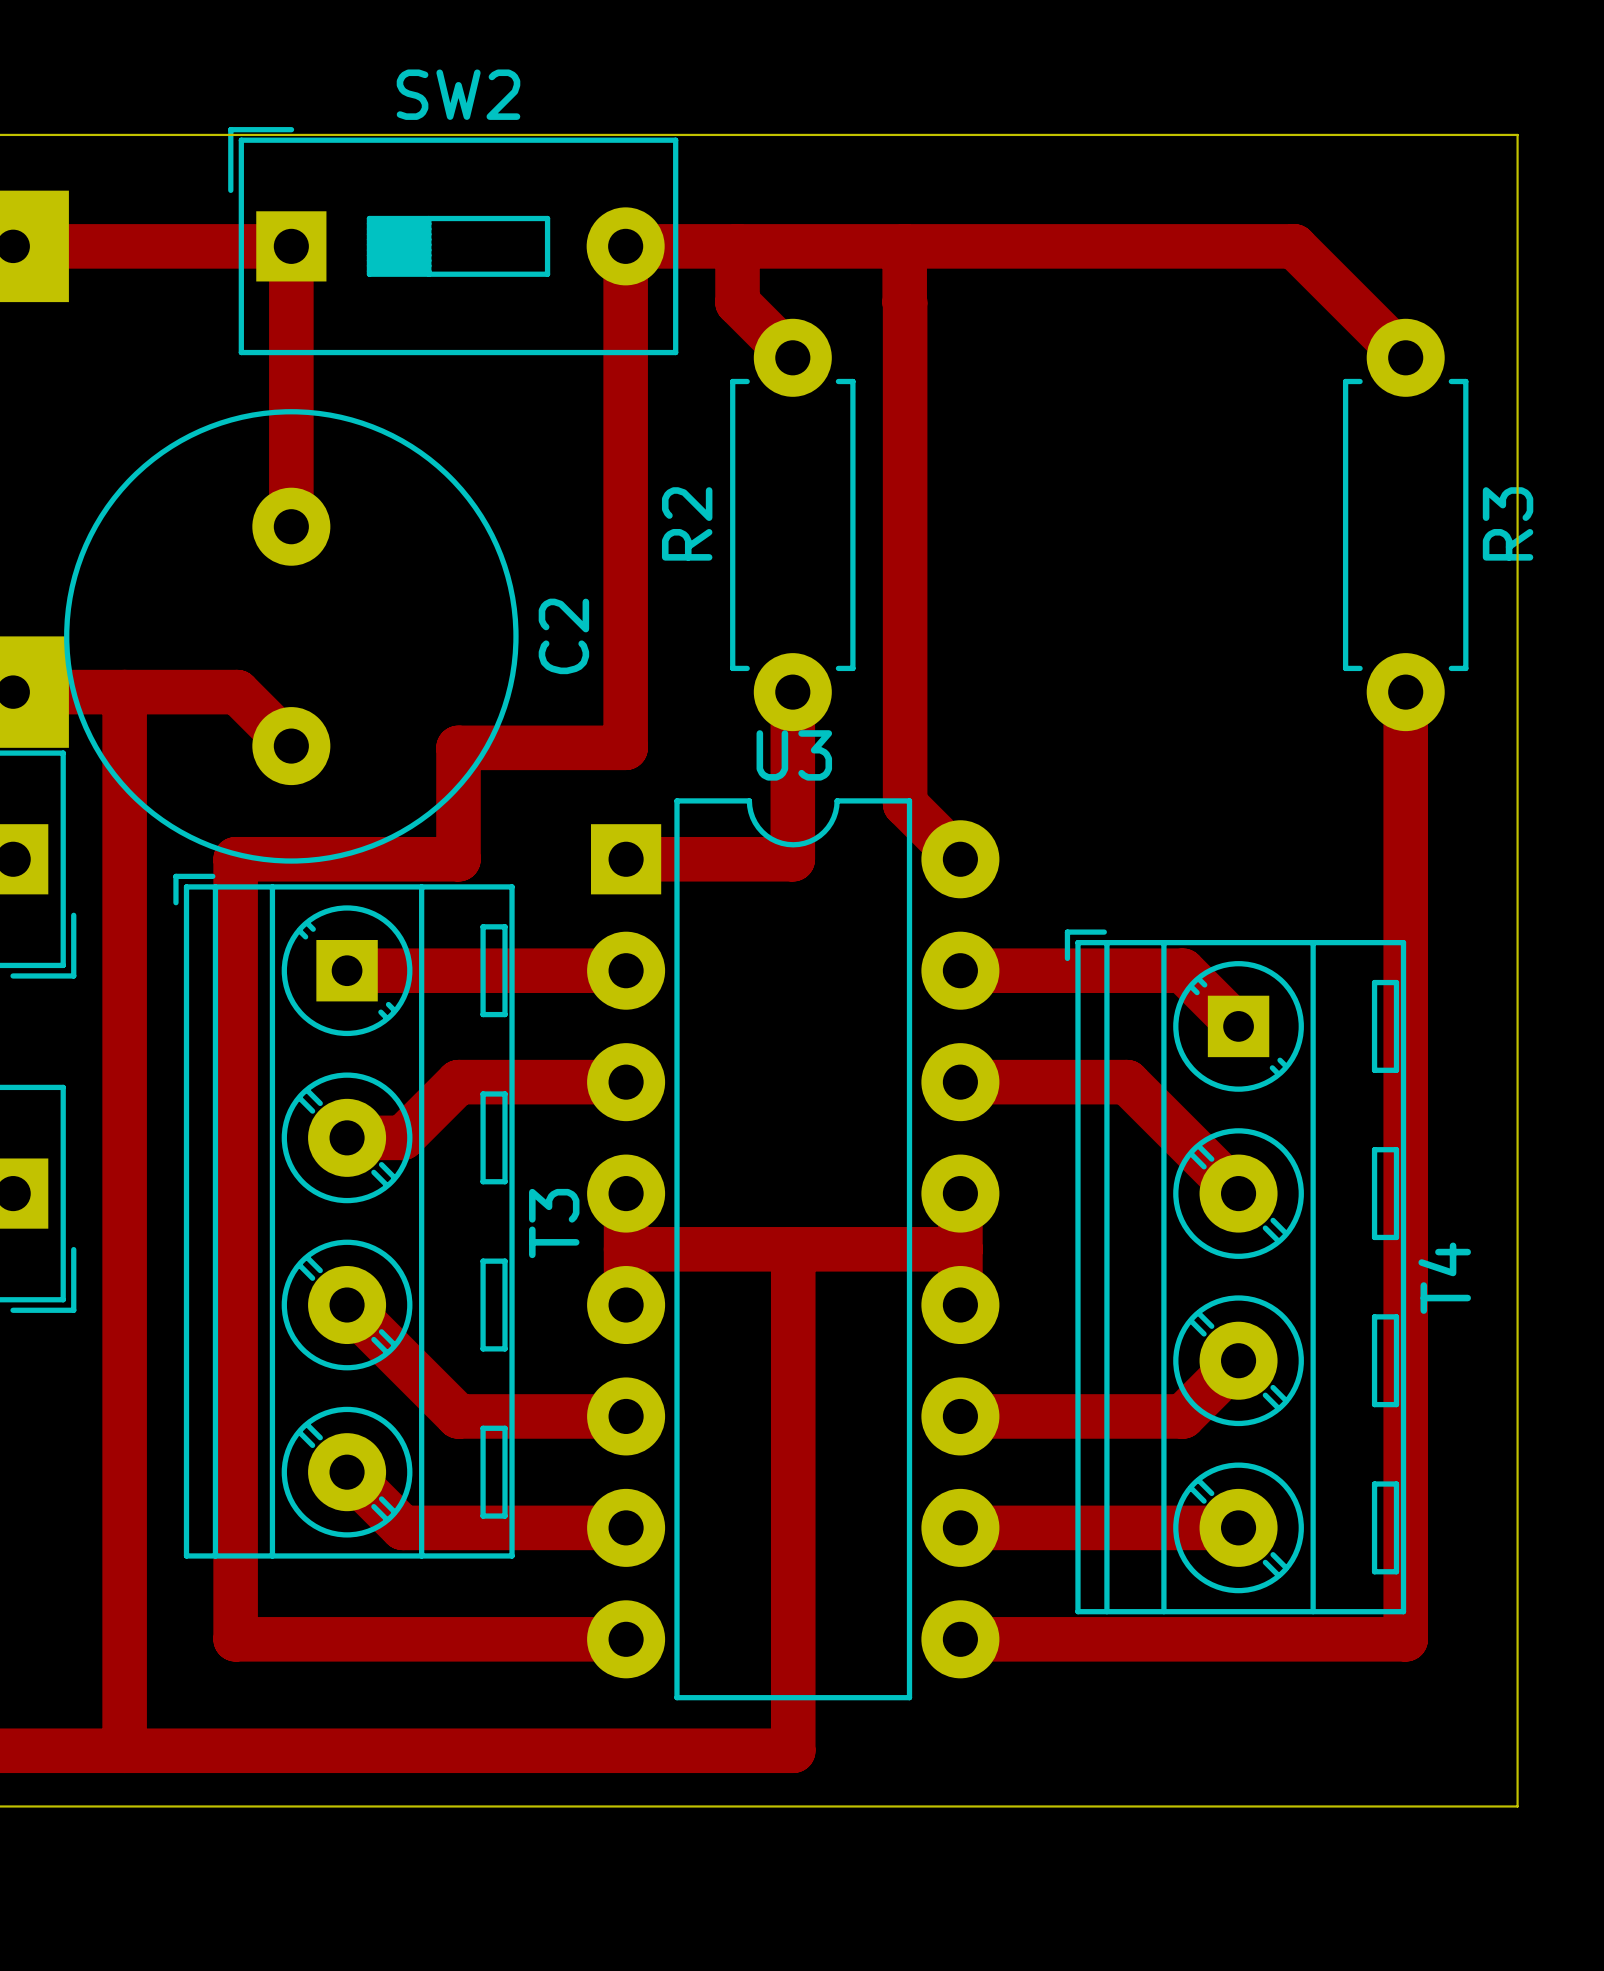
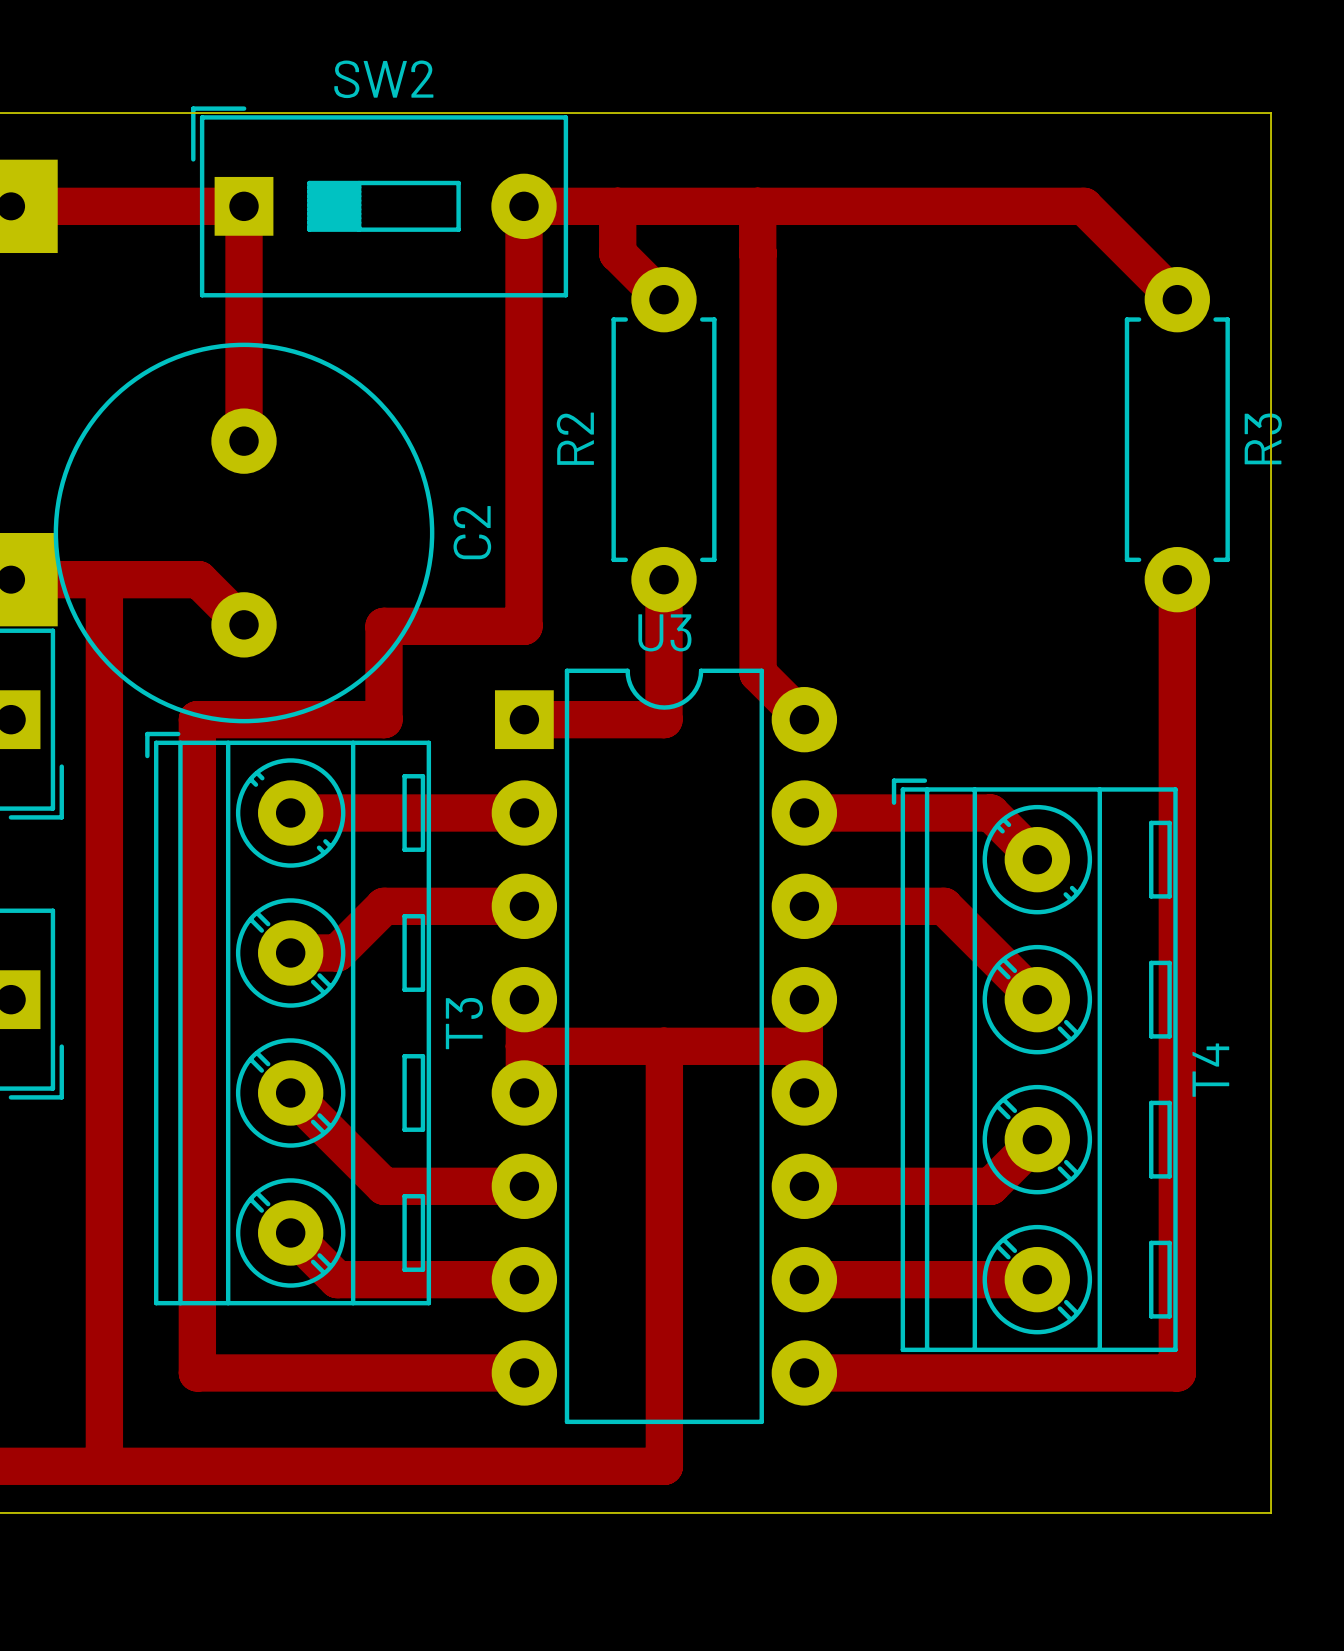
T3 footprint: [173, 873, 515, 1559] -> [145, 731, 432, 1306]
T4 footprint: [1064, 929, 1407, 1615] -> [891, 778, 1178, 1353]

